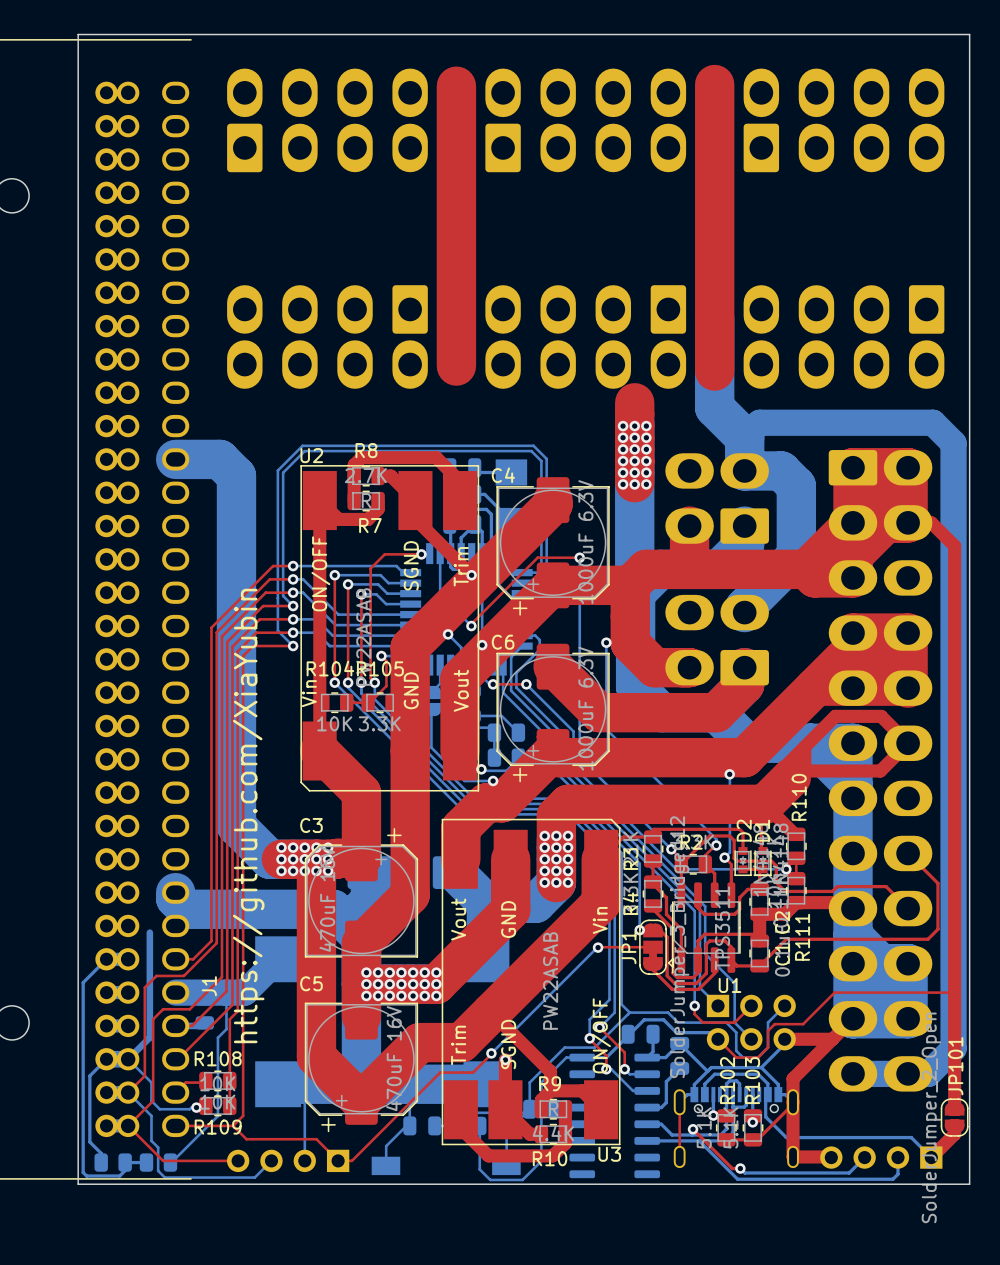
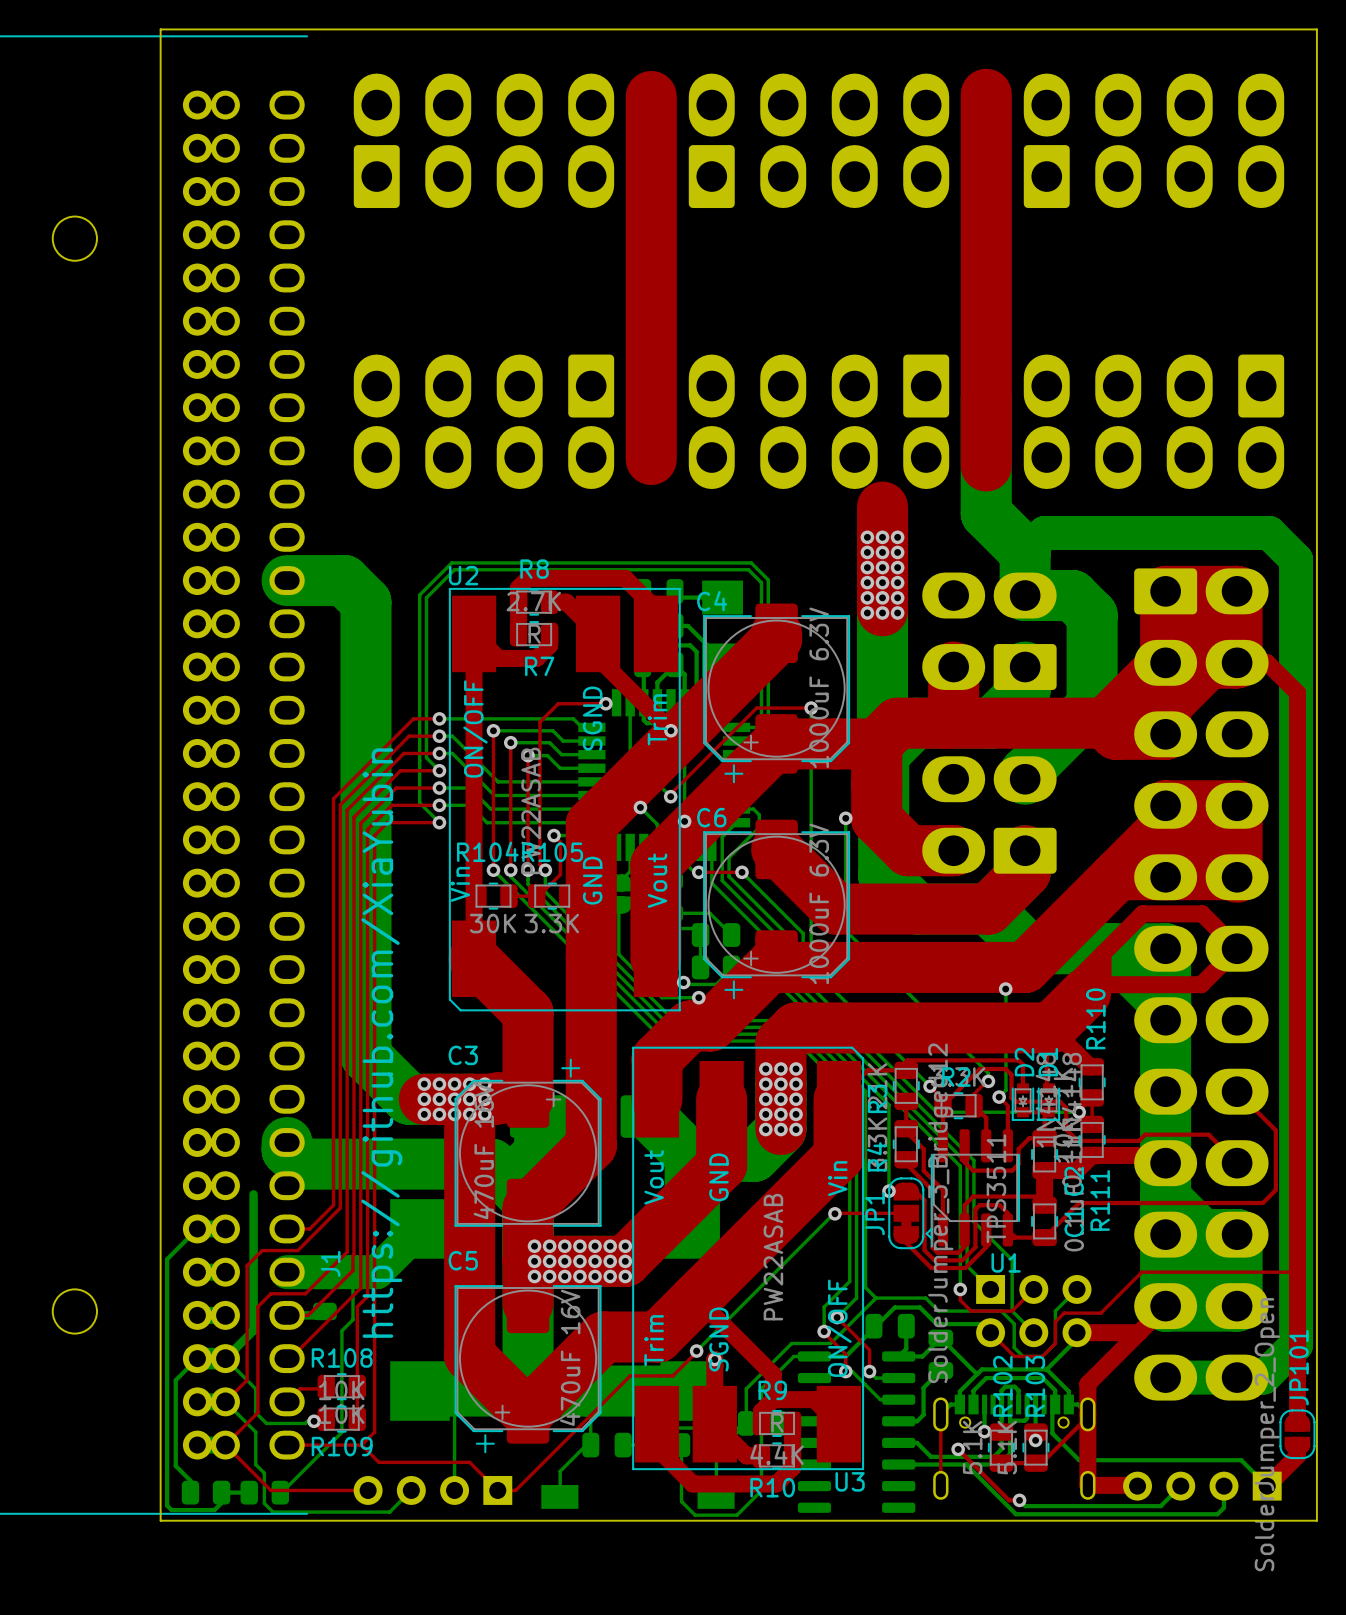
R104 value: 10K (334, 723) -> 30K (493, 923)

